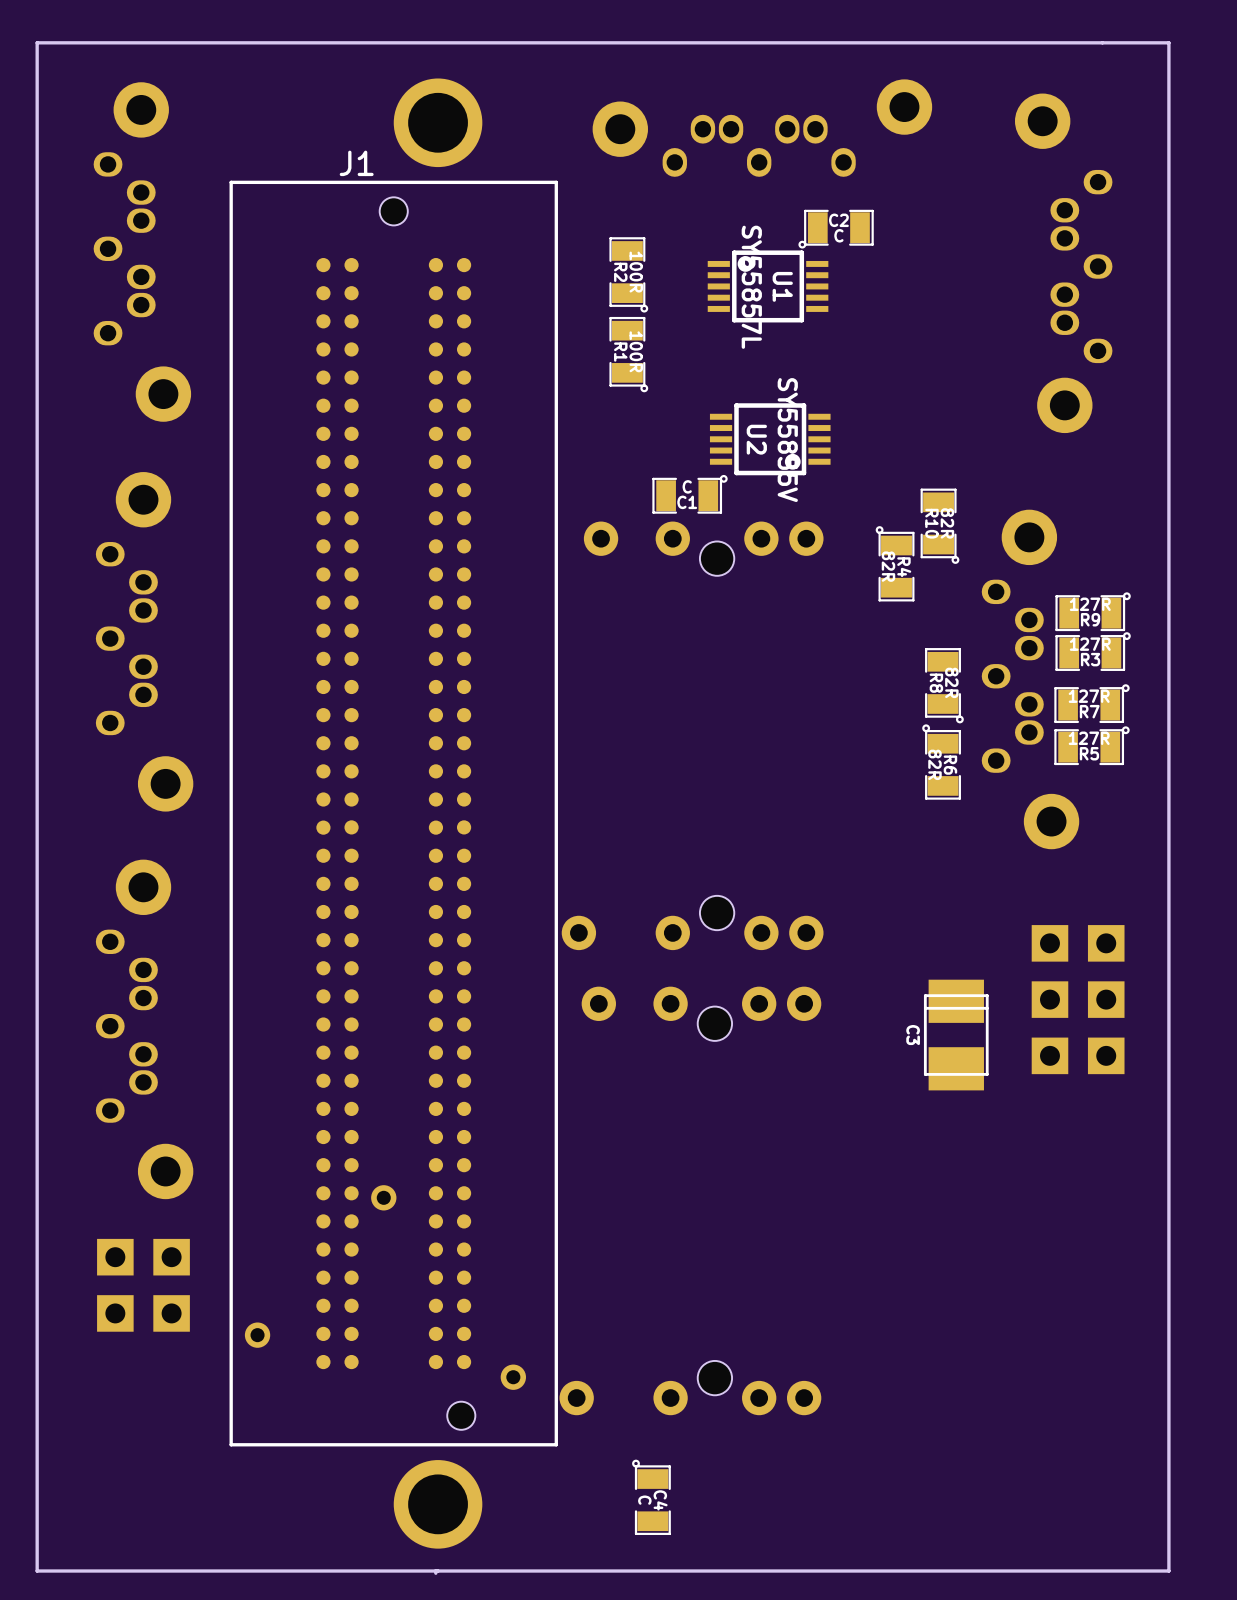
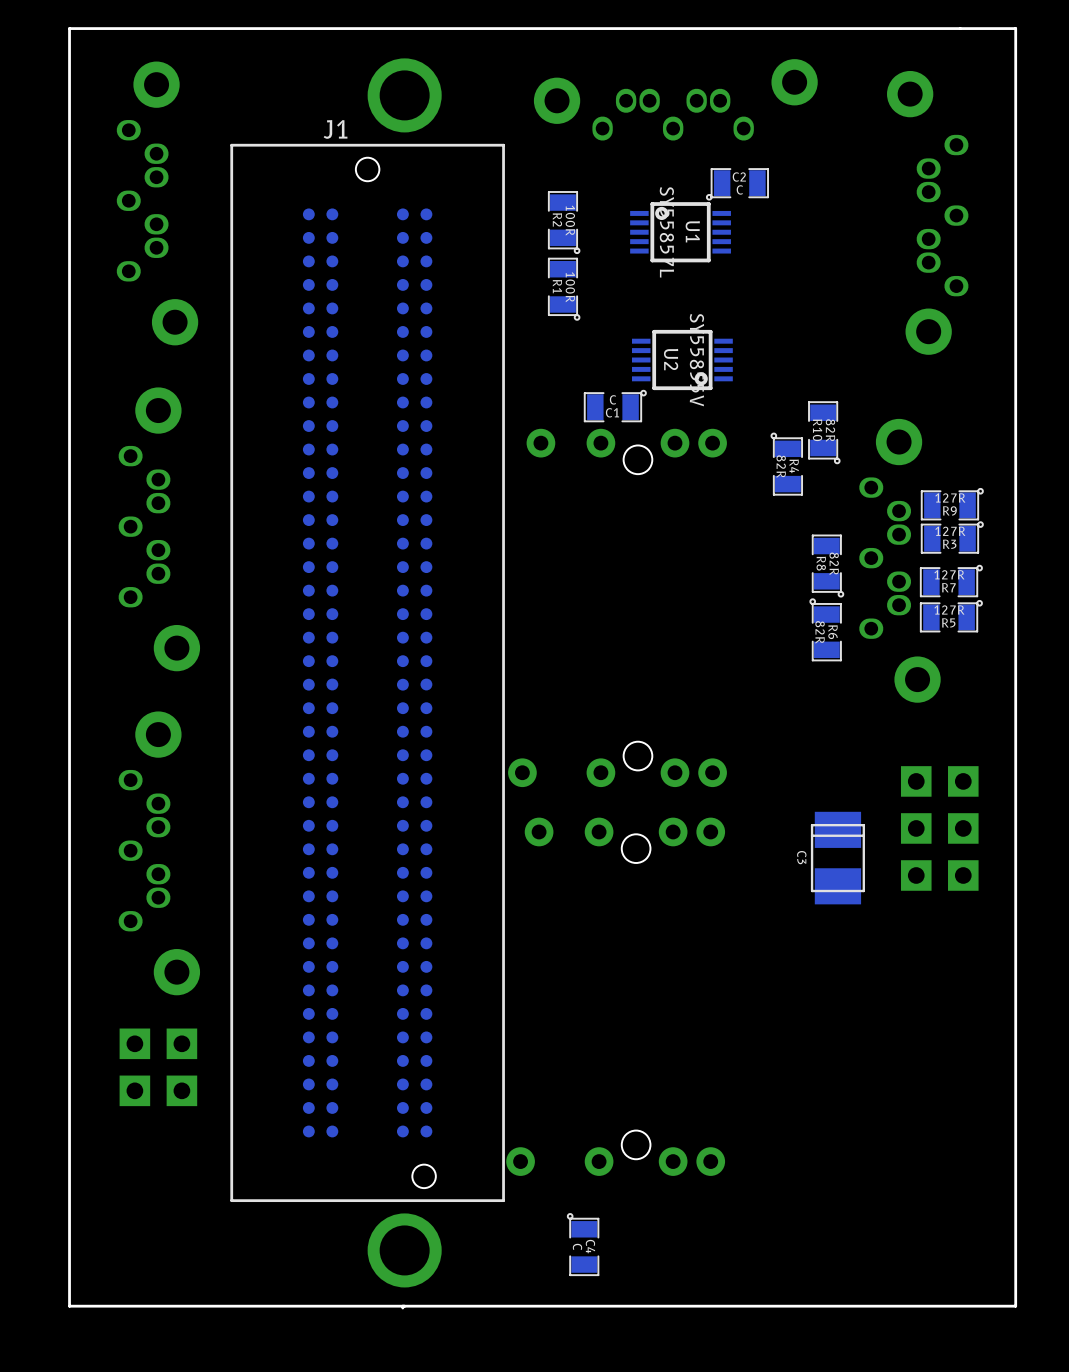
part: (383, 1197) -> none
part: (257, 1335) -> none
part: (513, 1377) -> none

